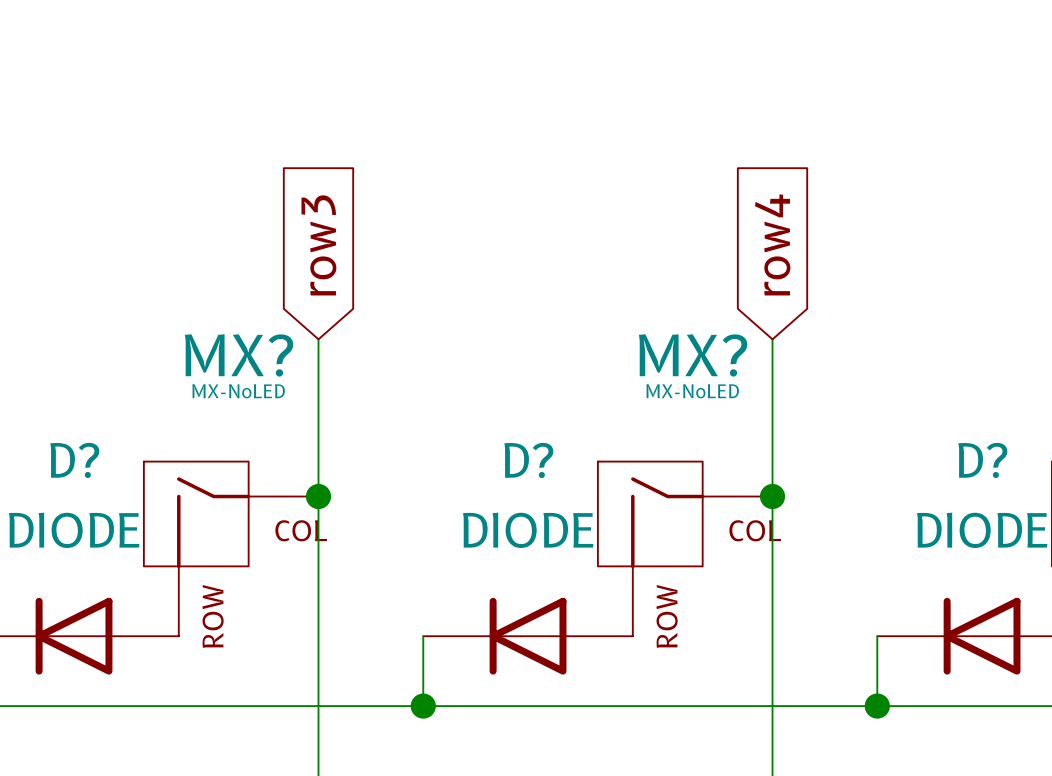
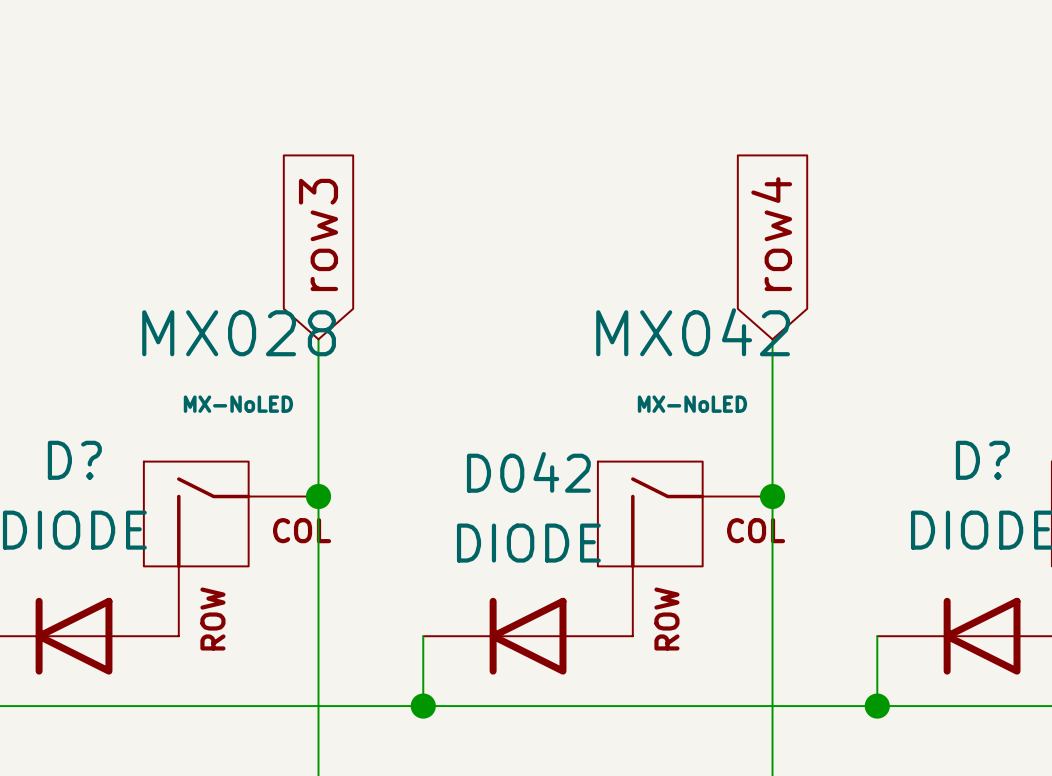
MX? name: MX? (239, 355) -> MX028 (239, 333)
MX? name: MX? (693, 355) -> MX042 (693, 332)
MX? value position: MX-NoLED (238, 391) -> MX-NoLED (238, 404)
MX? value position: MX-NoLED (692, 391) -> MX-NoLED (692, 404)
D? name: D? (528, 460) -> D042 (528, 472)
D? value position: DIODE (528, 530) -> DIODE (528, 543)

